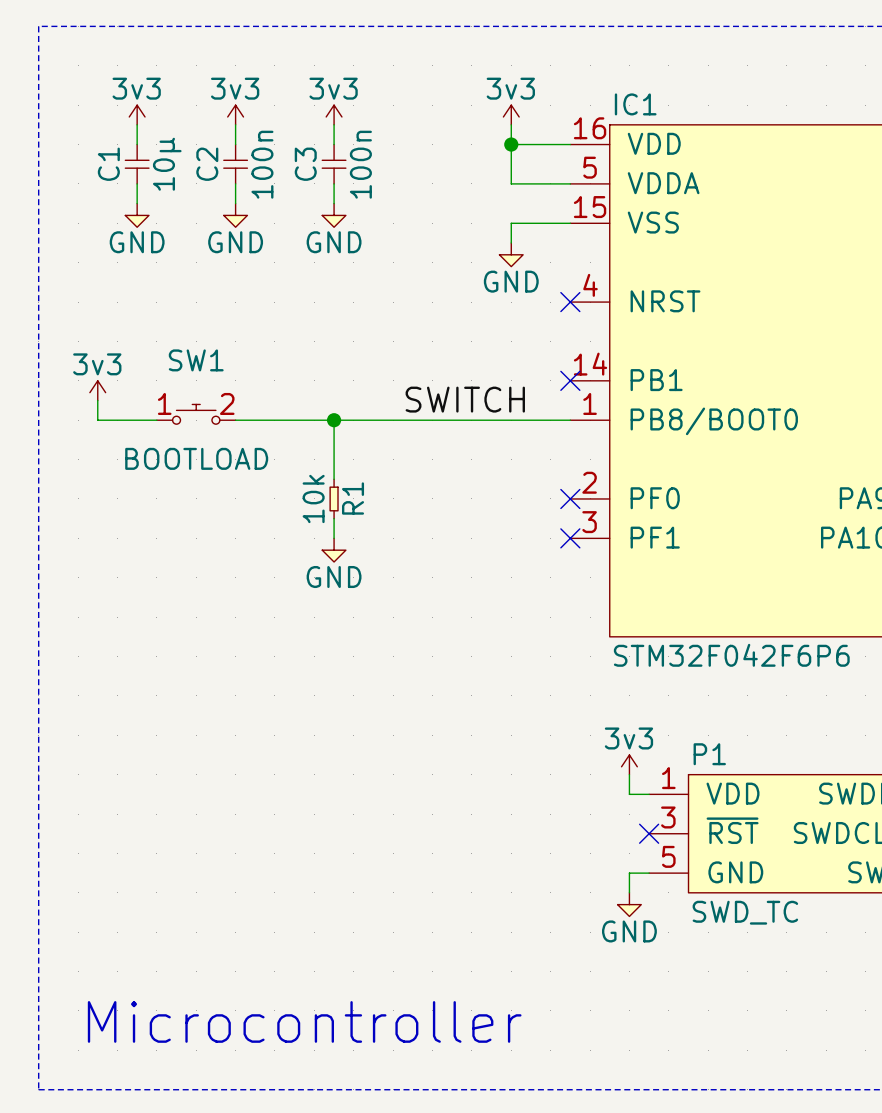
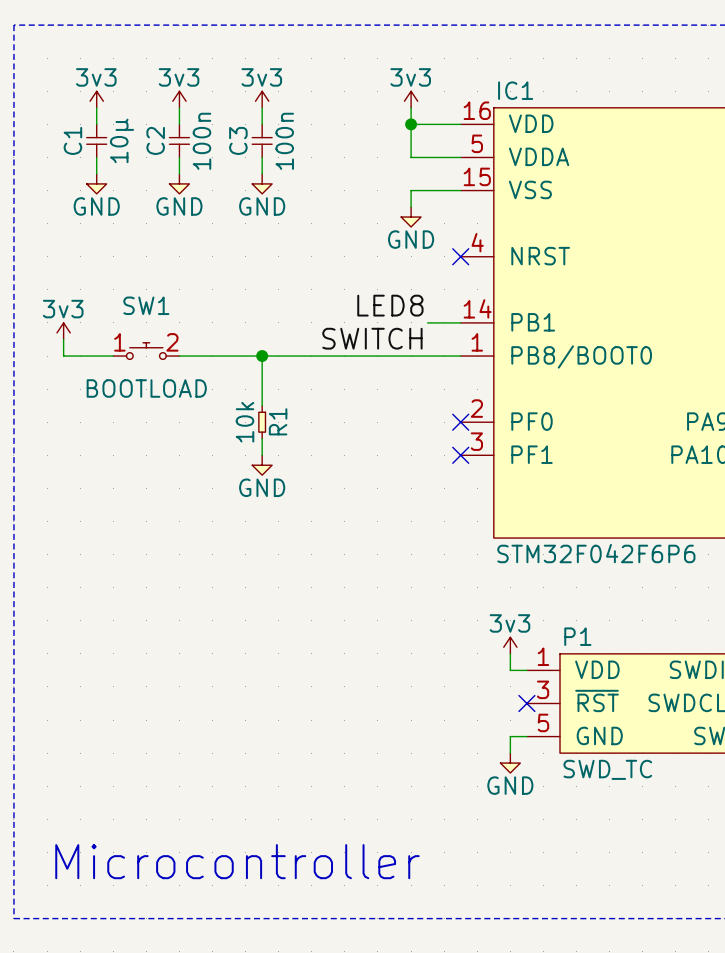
label: none -> LED8 (390, 305)
wire: none -> (427, 322) (460, 322)
no-connect mark: (570, 380) -> none

